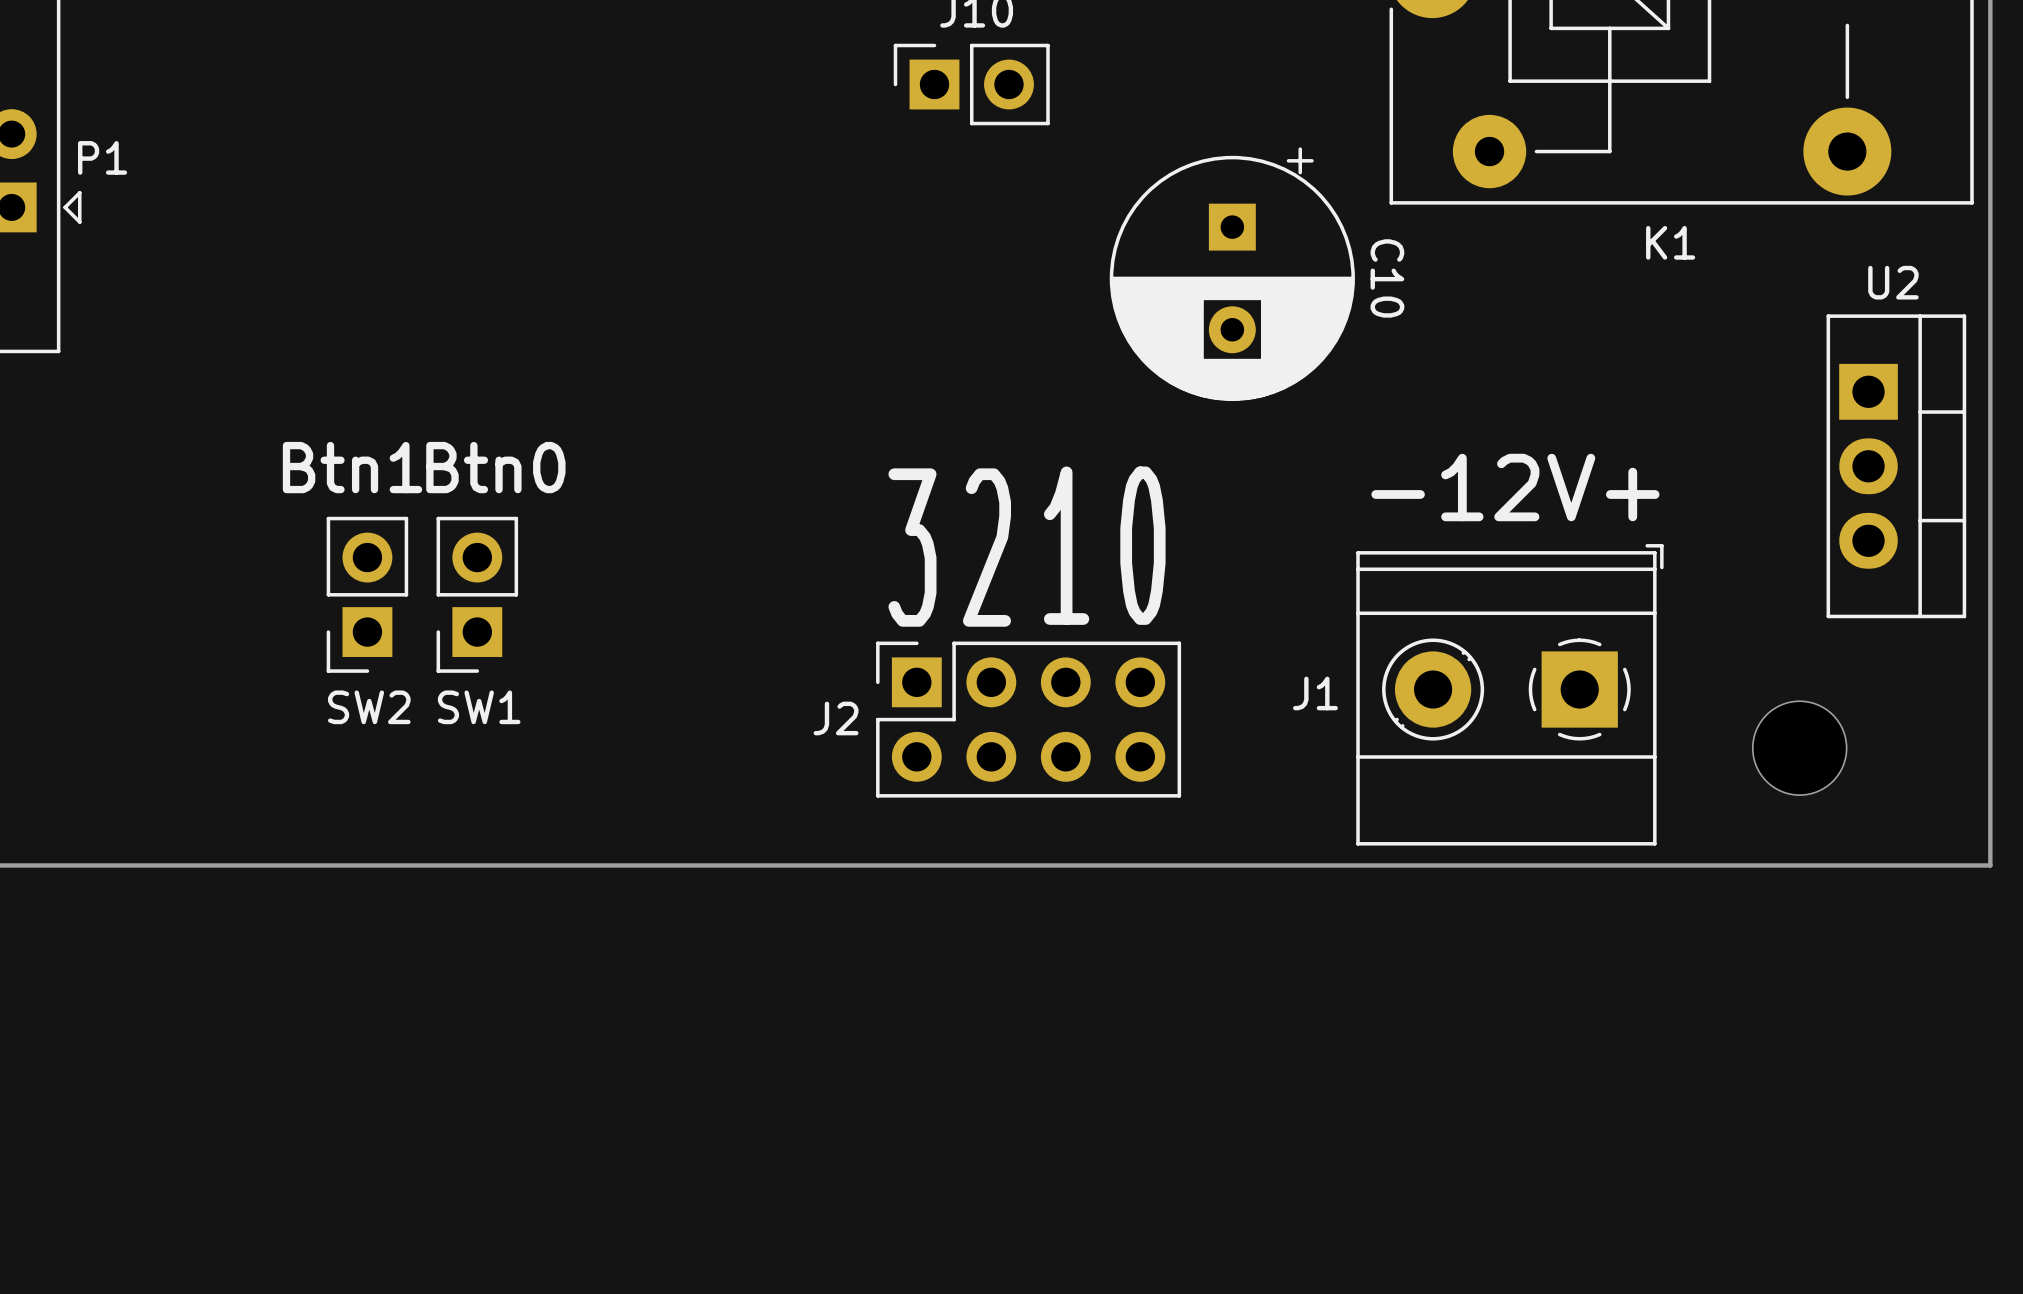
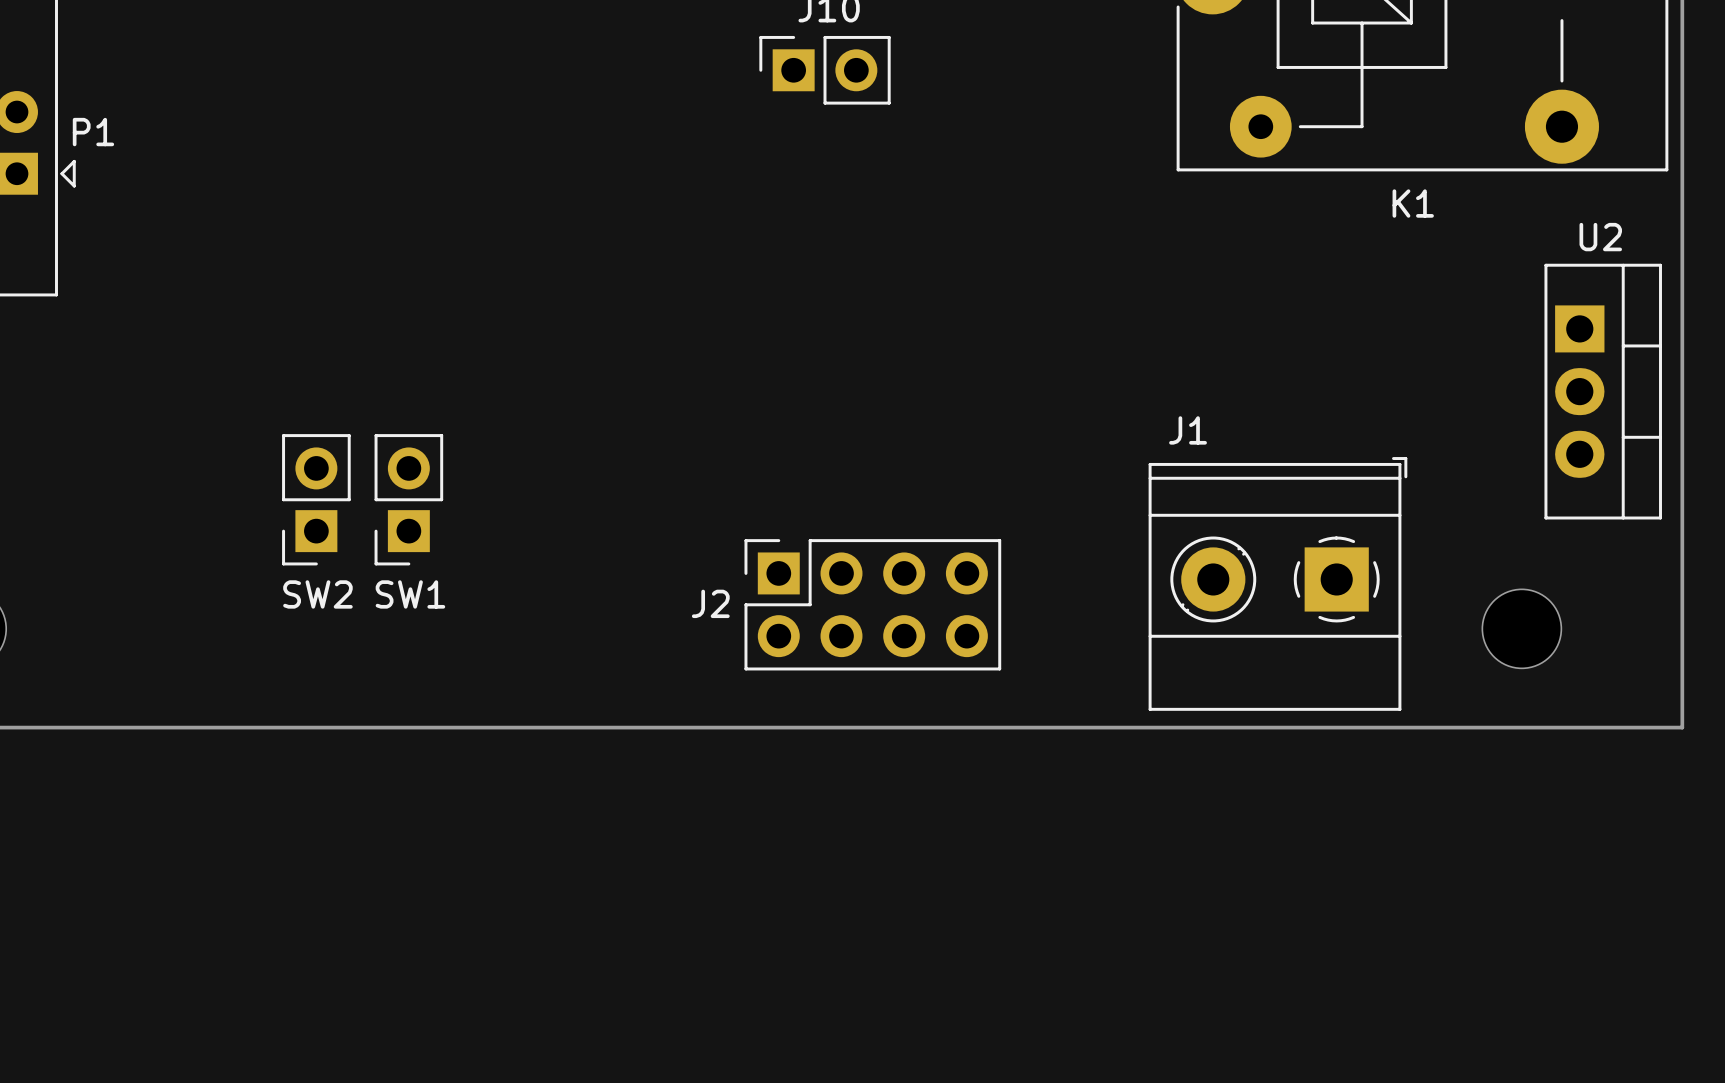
C10: (1232, 274) -> none
text: Btn1 (352, 467) -> none
text: Btn0 (495, 467) -> none
text: -12V+ (1515, 487) -> none
text: 1 (1066, 545) -> none
text: 0 (1142, 545) -> none
text: 3 (912, 547) -> none
text: 2 (986, 547) -> none
J1 name position: J1 (1315, 693) -> J1 (1188, 430)

